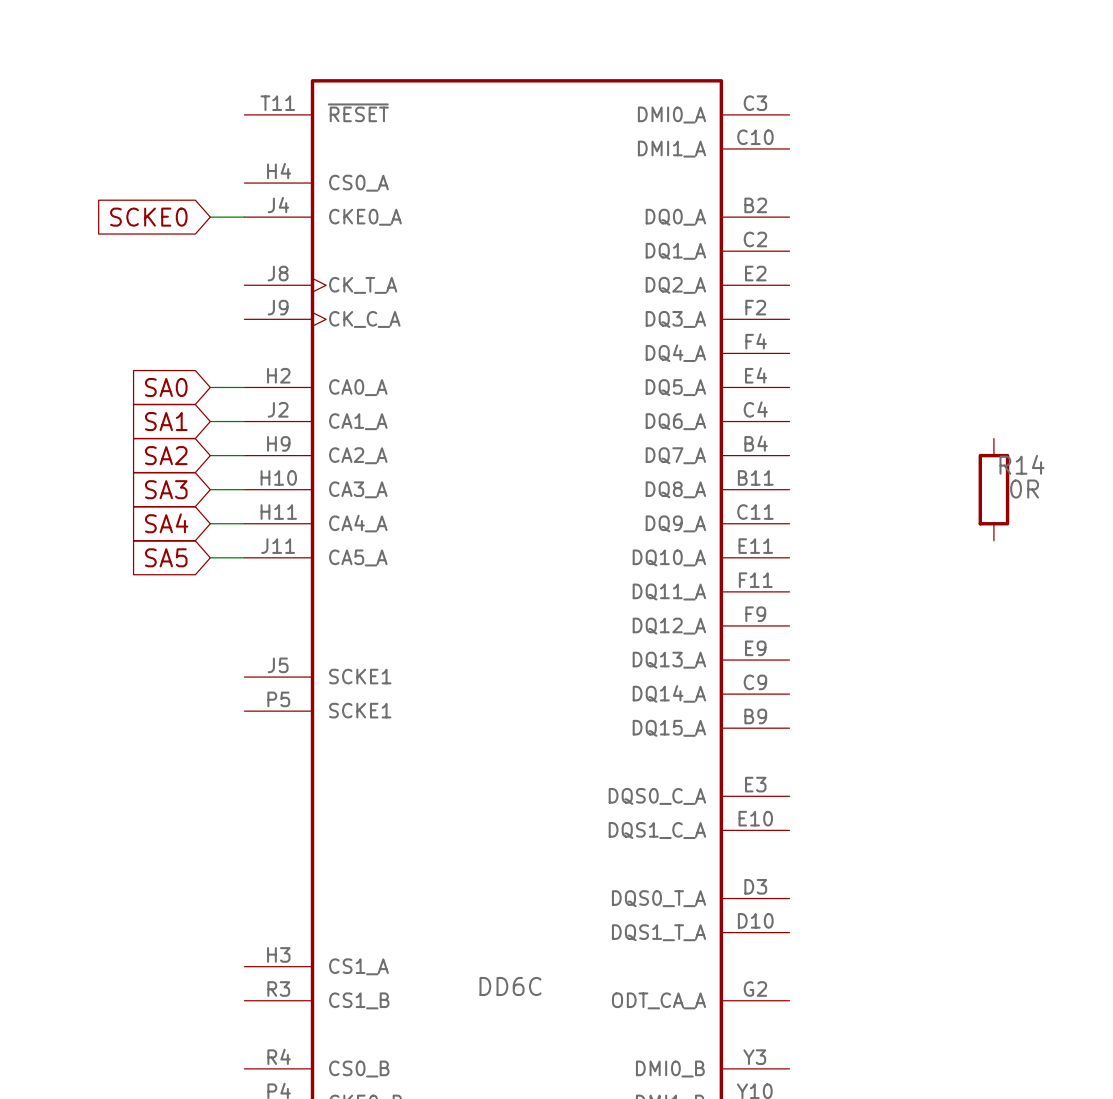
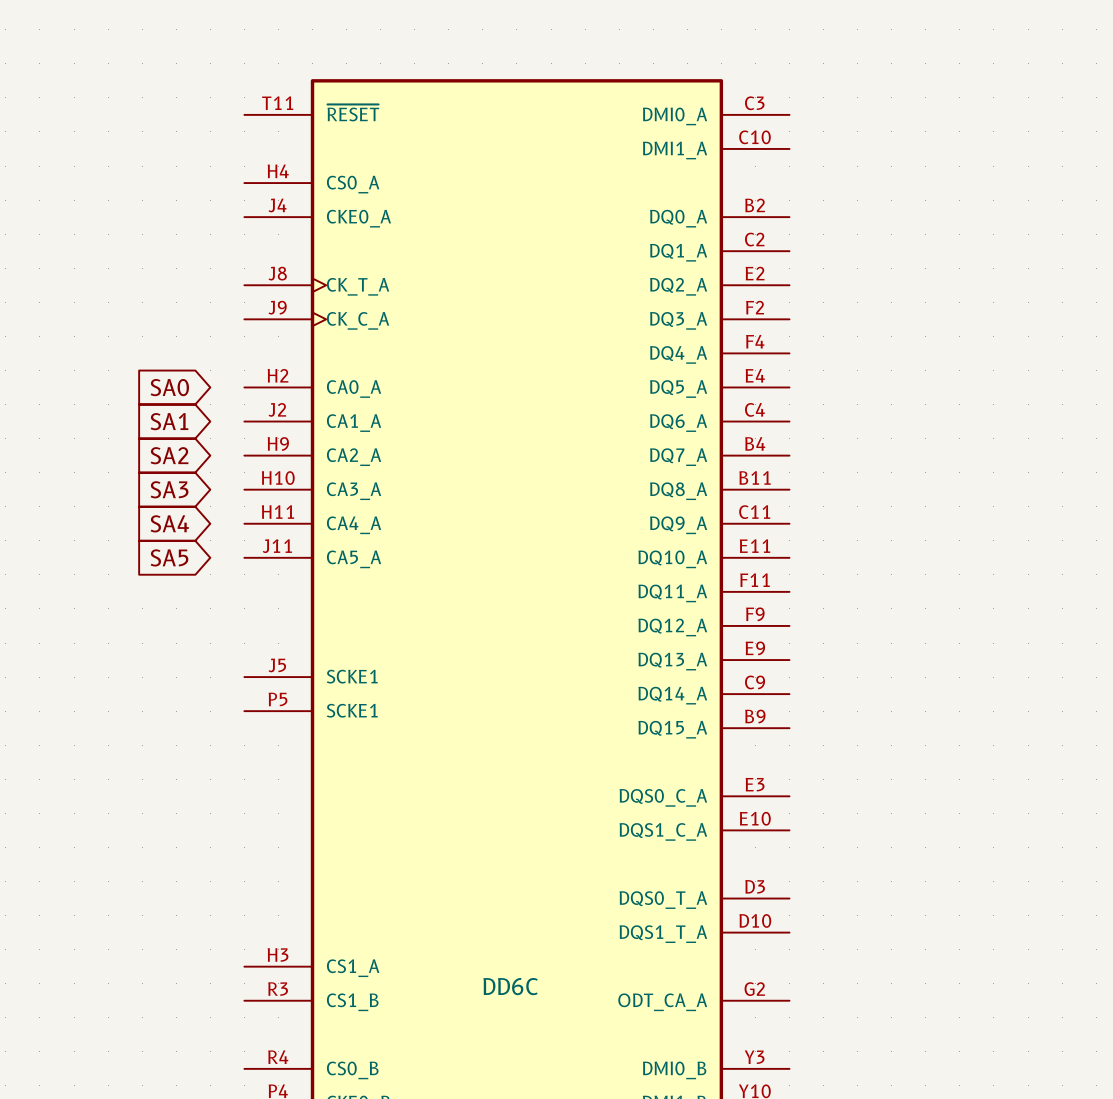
global label: SCKE0 (148, 217) -> none
wire: (210, 217) (244, 217) -> none
wire: (210, 387) (244, 387) -> none
wire: (210, 421) (244, 421) -> none
wire: (210, 455) (244, 455) -> none
wire: (210, 489) (244, 489) -> none
R14: 0R (993, 489) -> none
wire: (210, 523) (244, 523) -> none
wire: (210, 557) (244, 557) -> none

